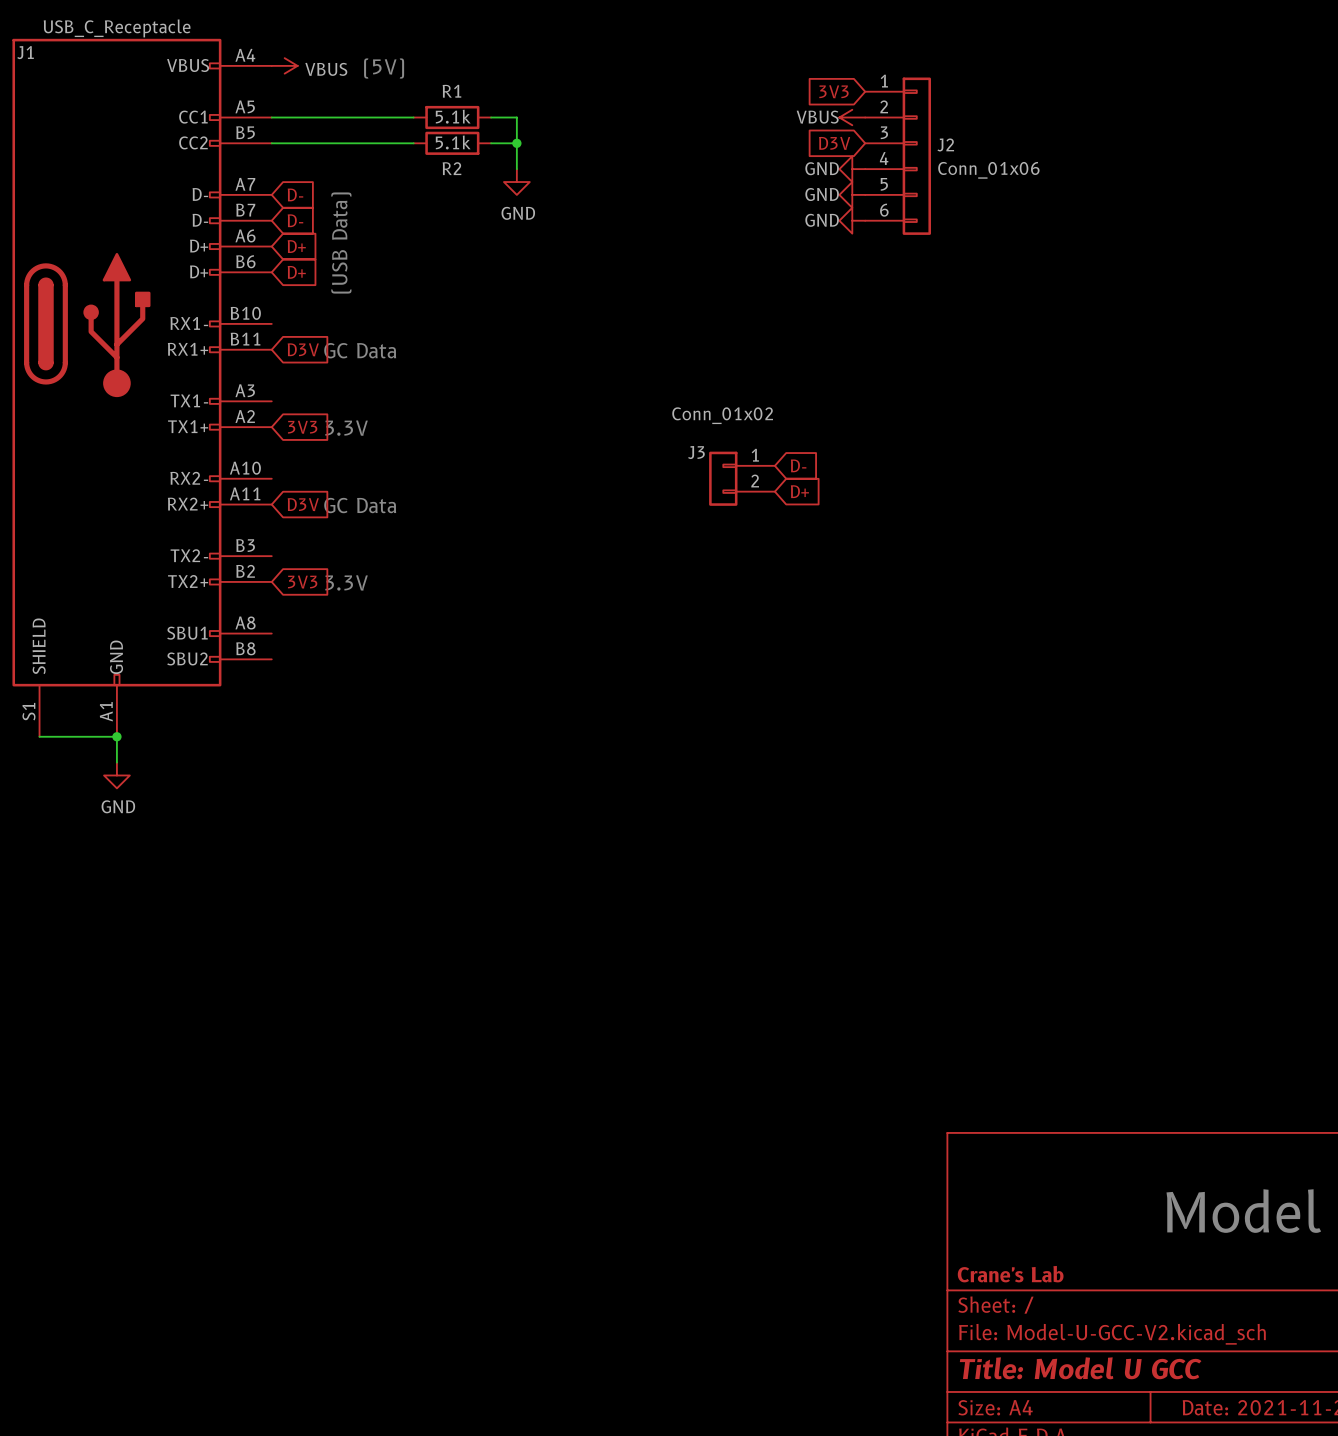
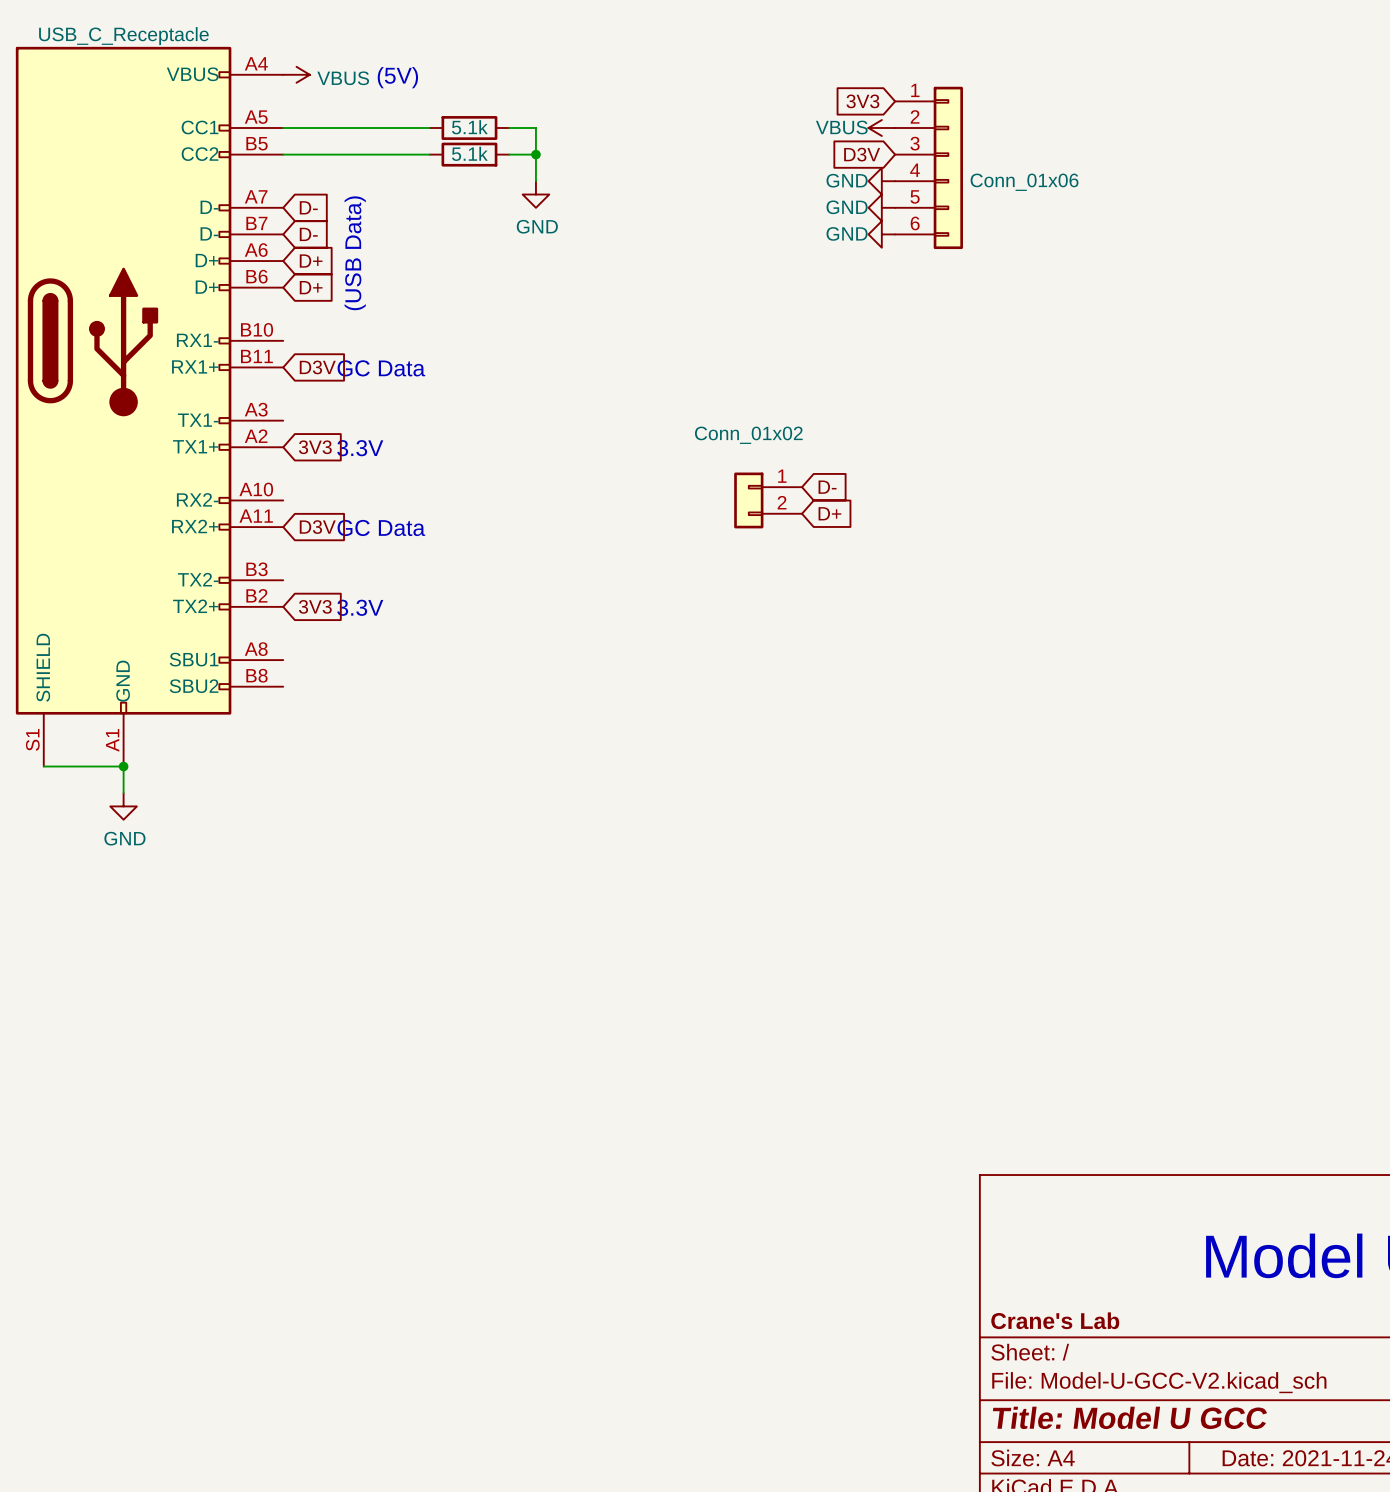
J1 name: J1 (25, 52) -> none
R1 name: R1 (451, 91) -> none
J2 name: J2 (945, 144) -> none
R2 name: R2 (451, 168) -> none
J3 name: J3 (696, 452) -> none

